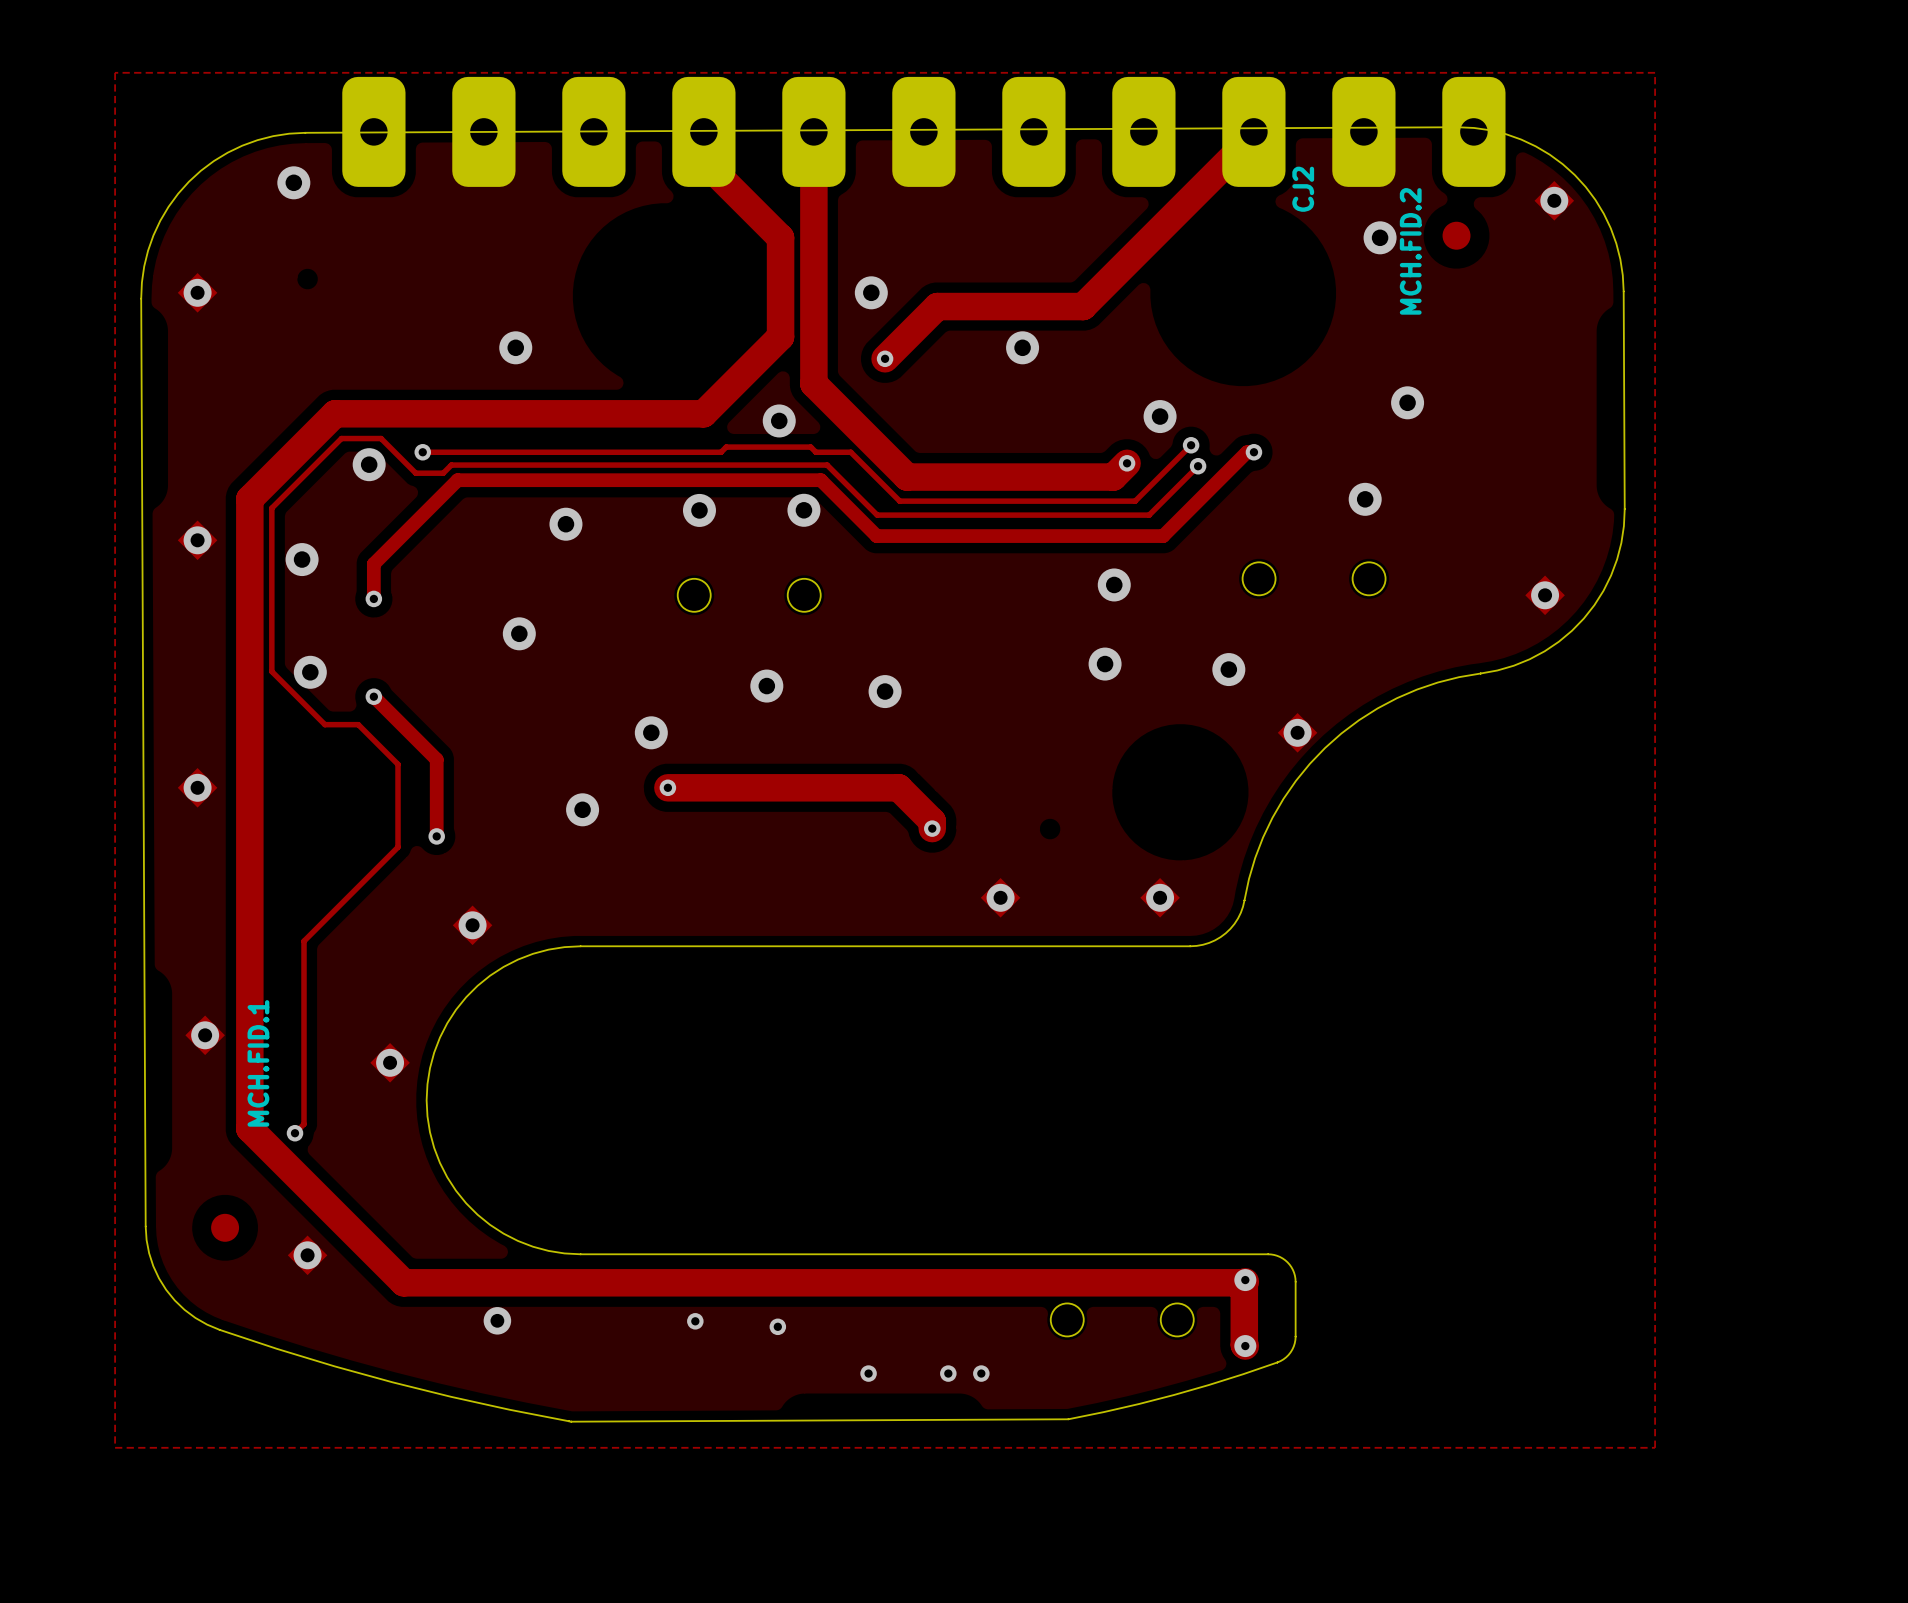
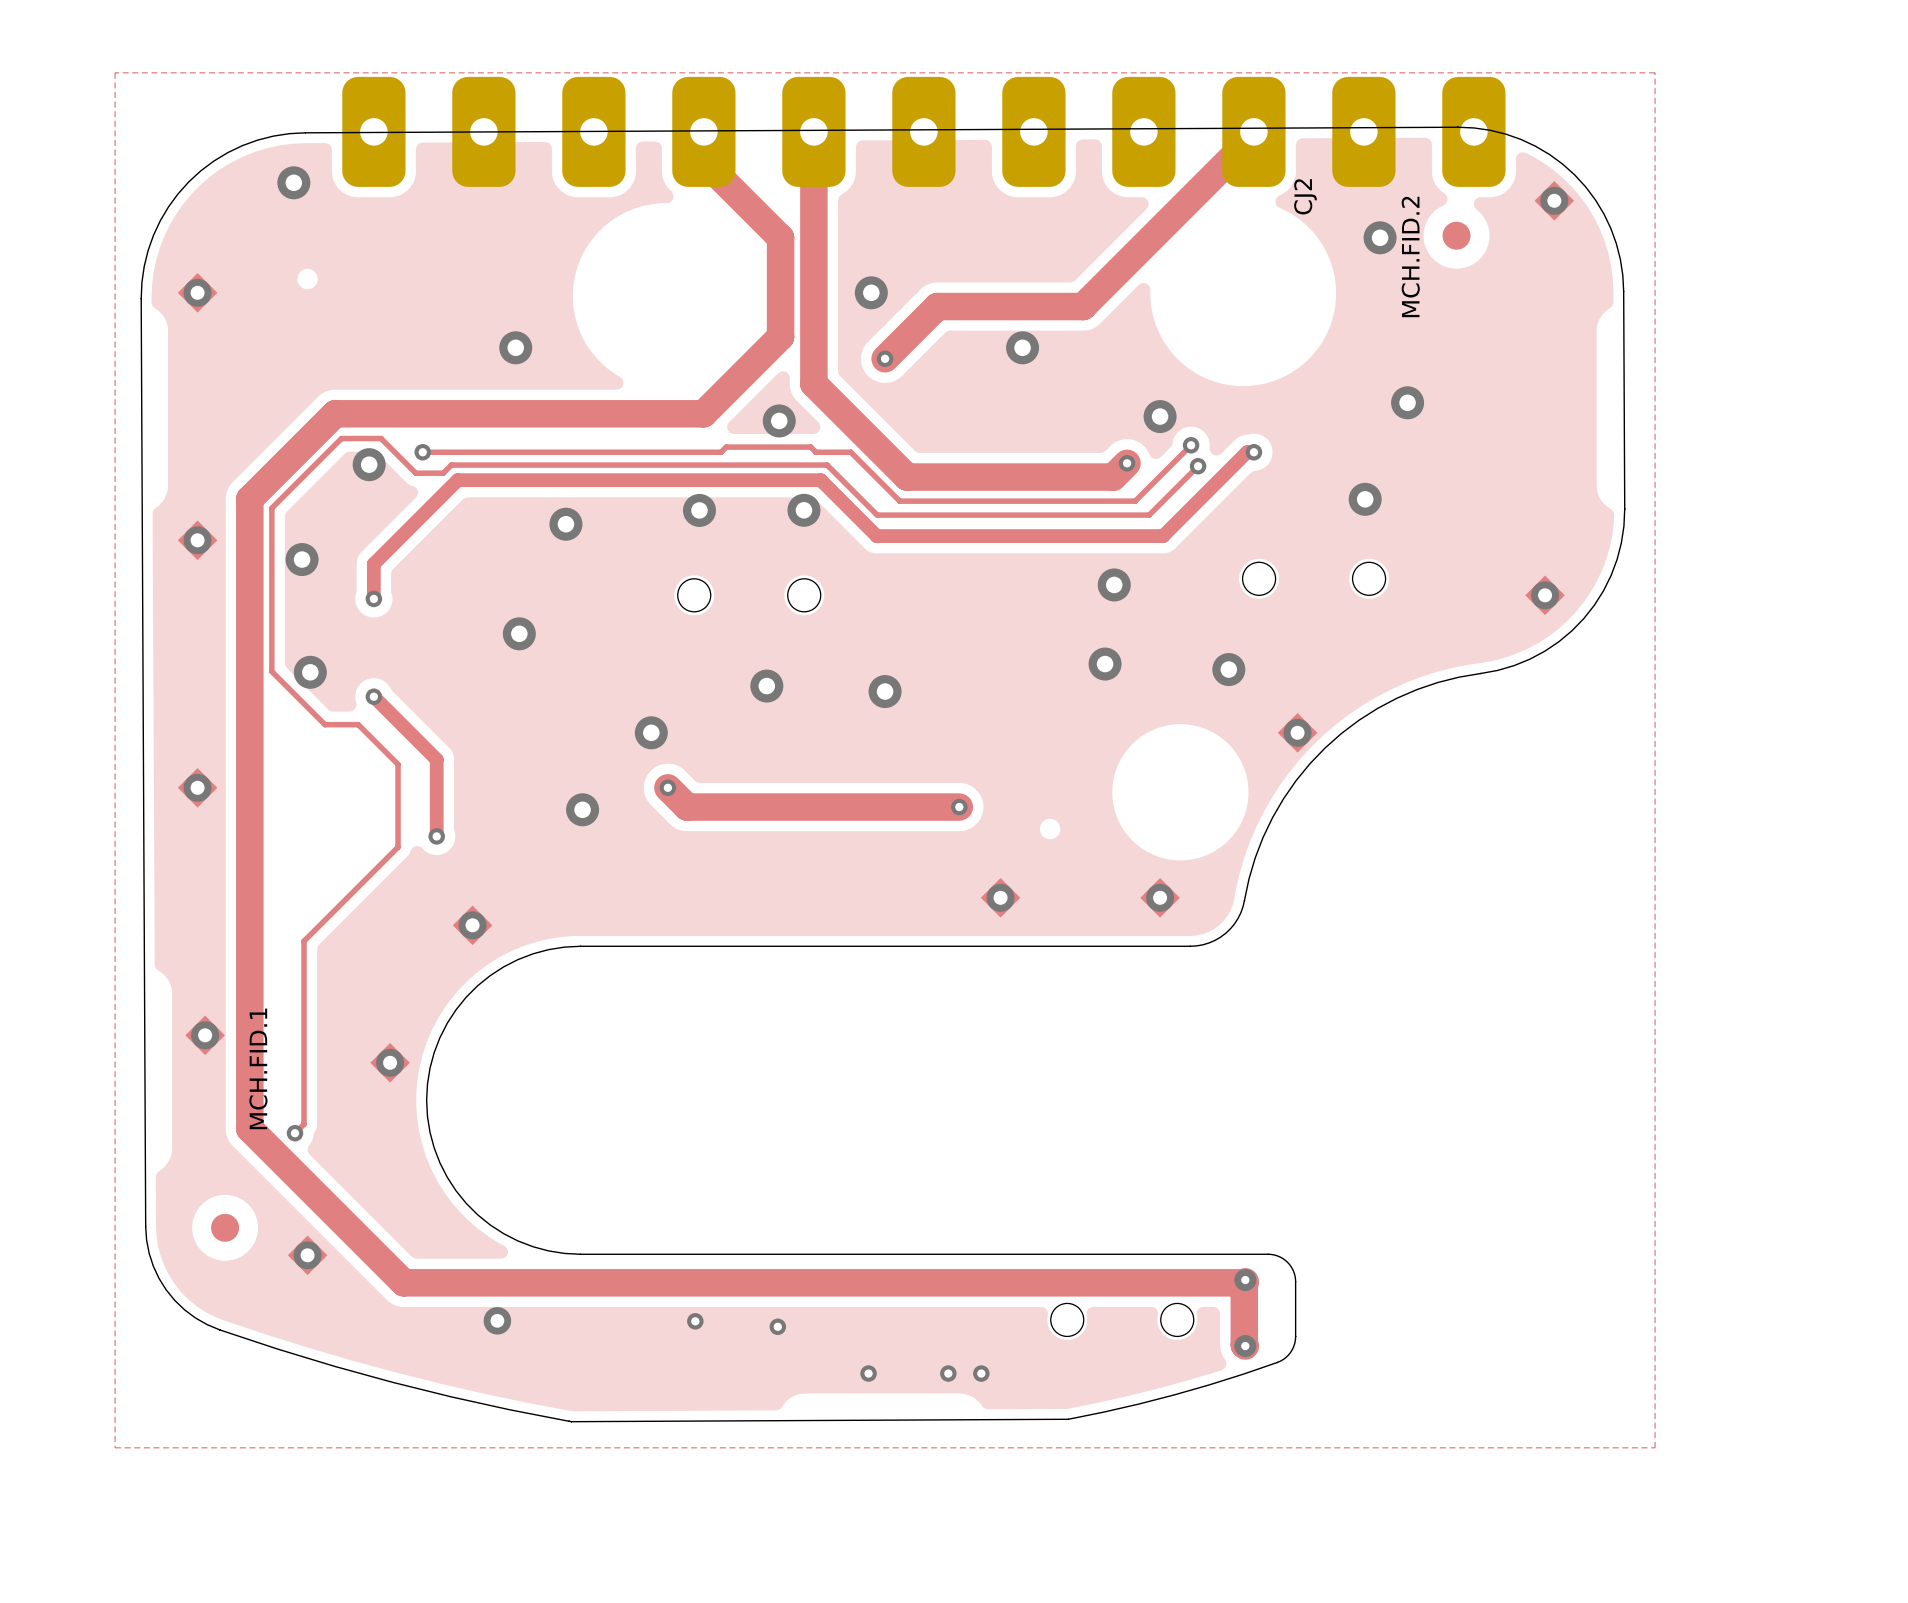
track: (667, 787) (898, 787) (932, 821) (932, 828) -> (667, 787) (687, 807) (959, 807)
via position: (932, 828) -> (959, 807)

